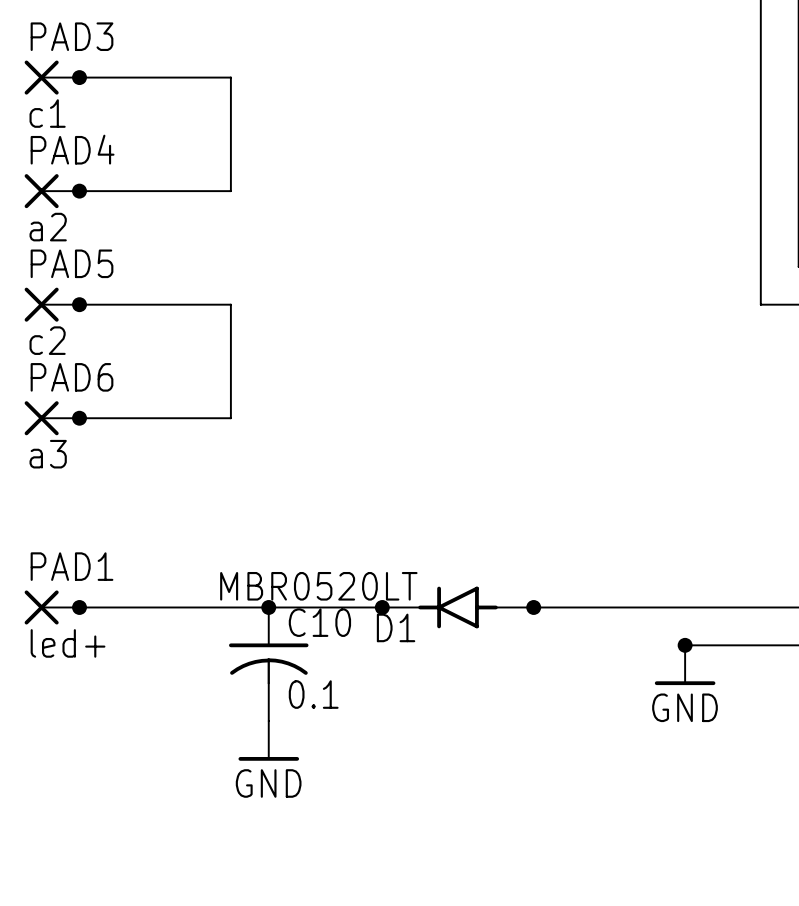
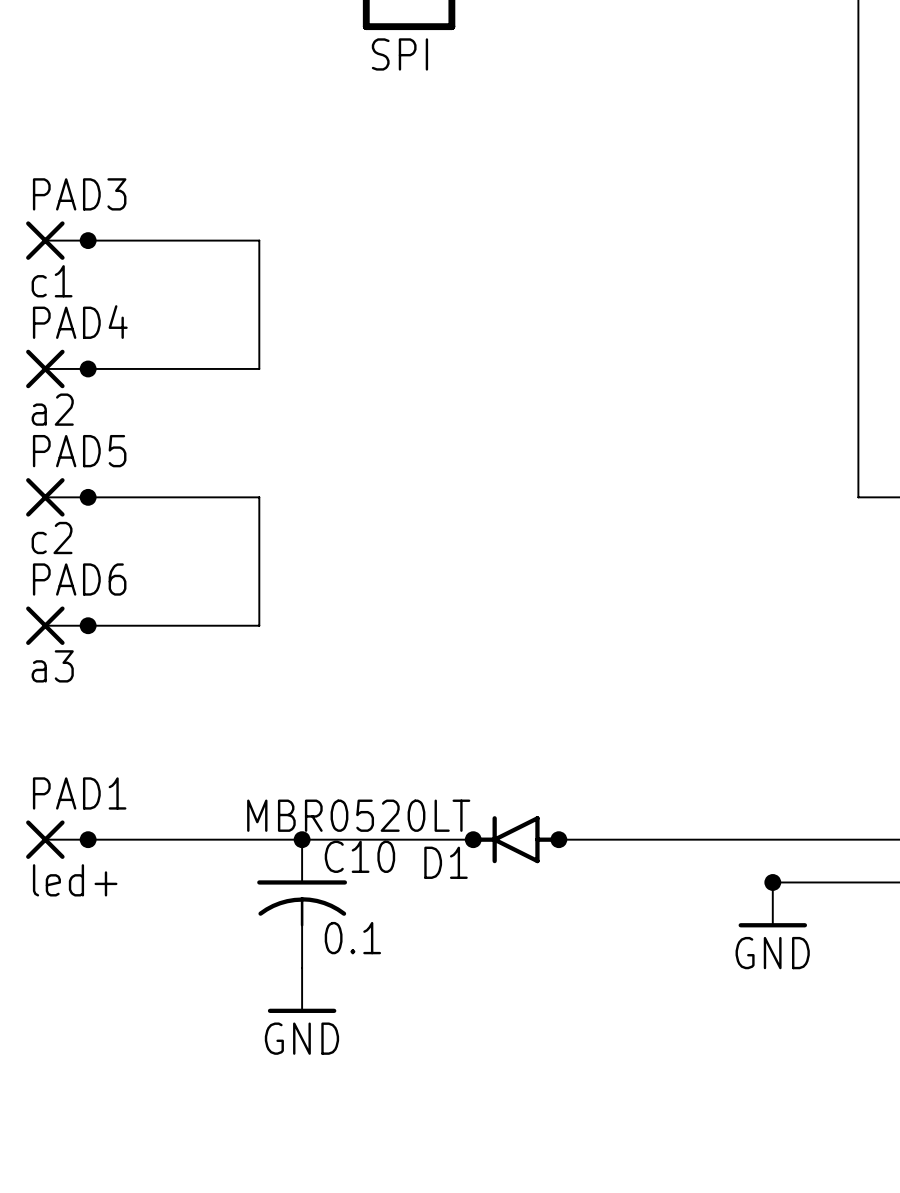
junction position: (382, 607) -> (473, 839)
junction position: (533, 607) -> (558, 839)

